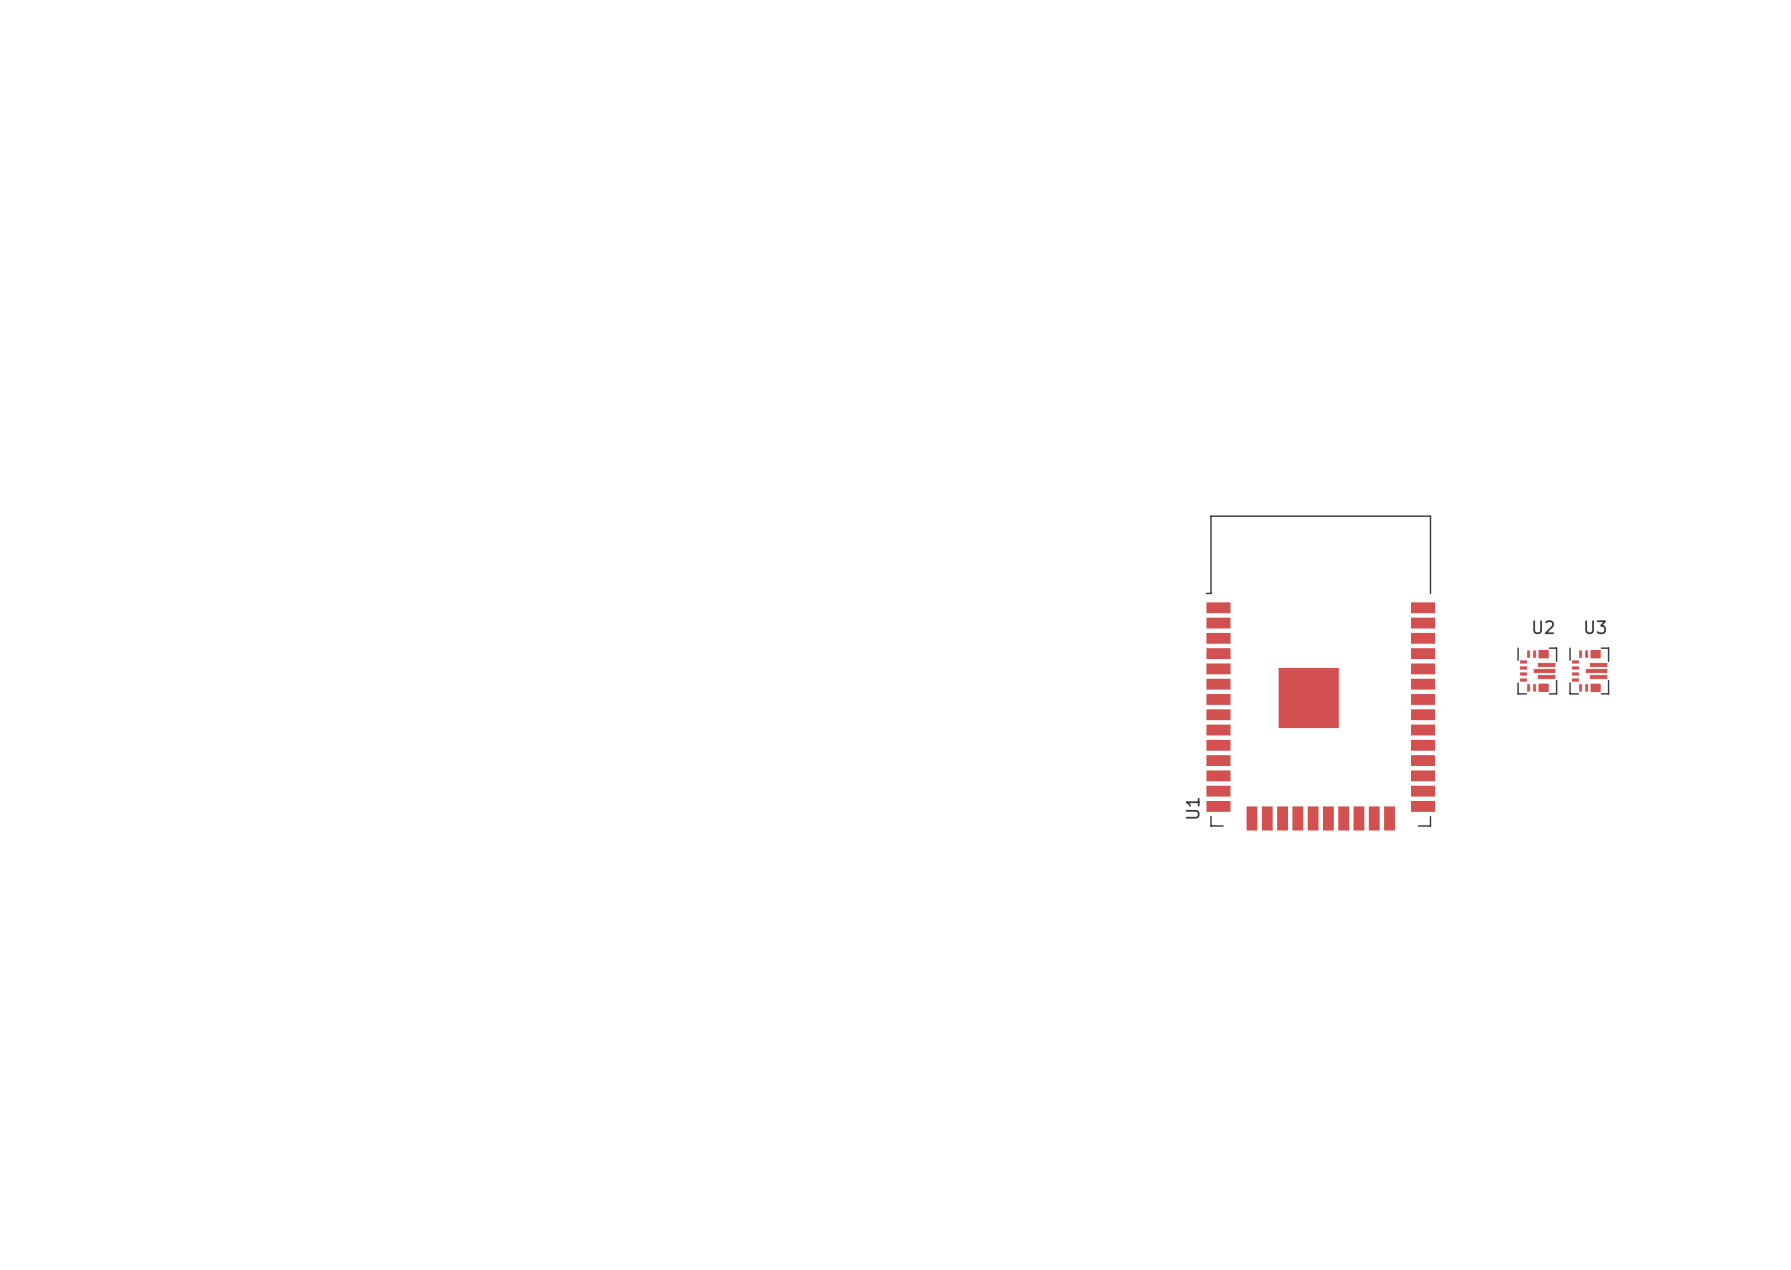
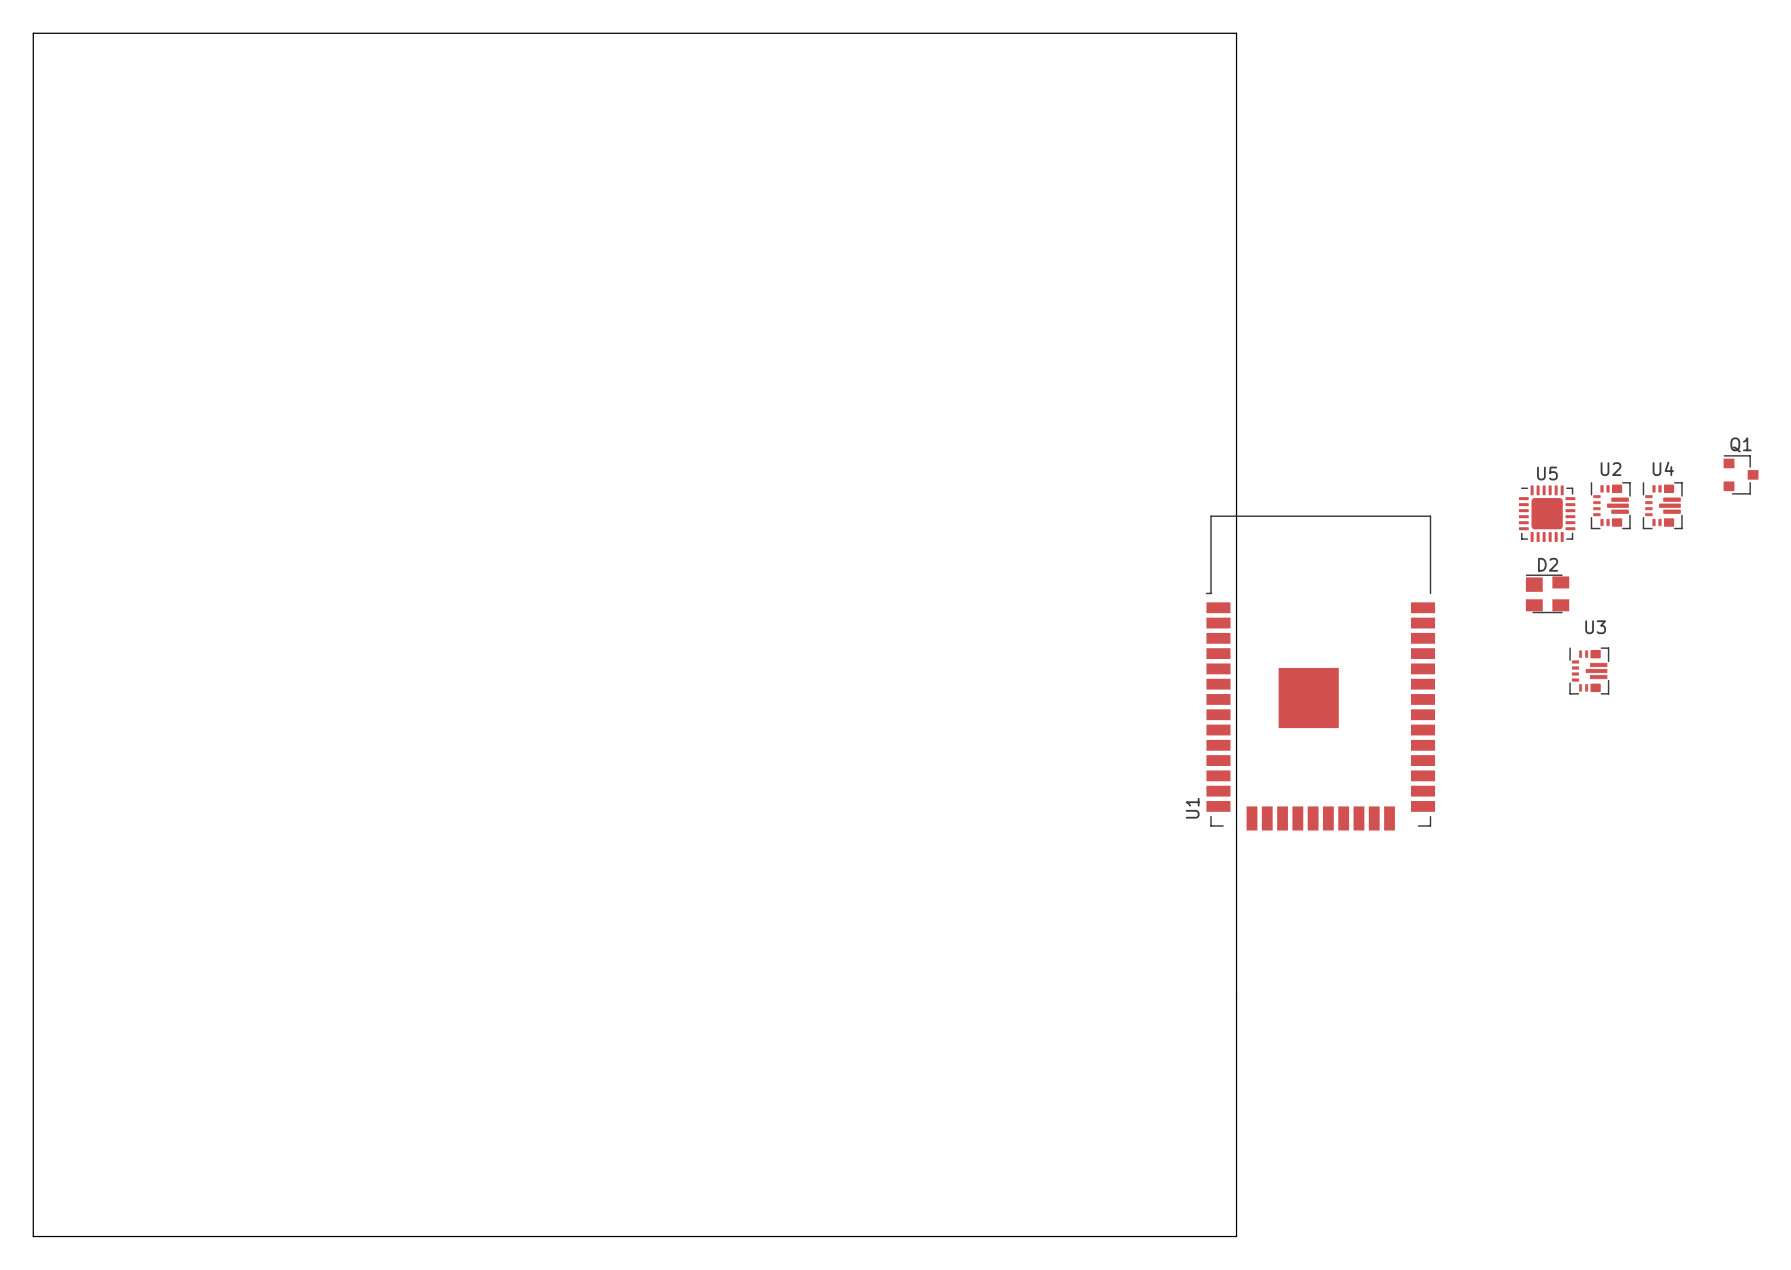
board edge: none -> (33, 33) (33, 1236) (1236, 1236) (1236, 33) (33, 33)
Q1: none -> (1740, 474)
U4: none -> (1662, 505)
U5: none -> (1547, 513)
D2: none -> (1547, 593)
U2 name position: U2 (1543, 627) -> U2 (1611, 469)
U2 position: (1537, 671) -> (1610, 505)

